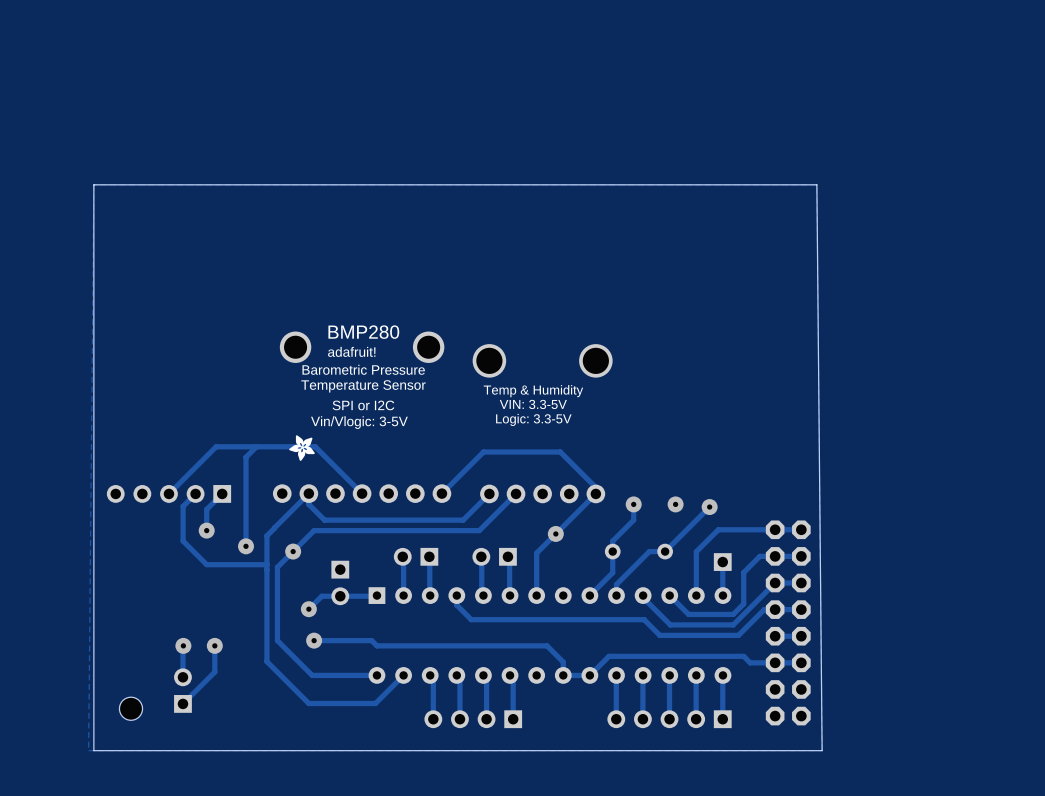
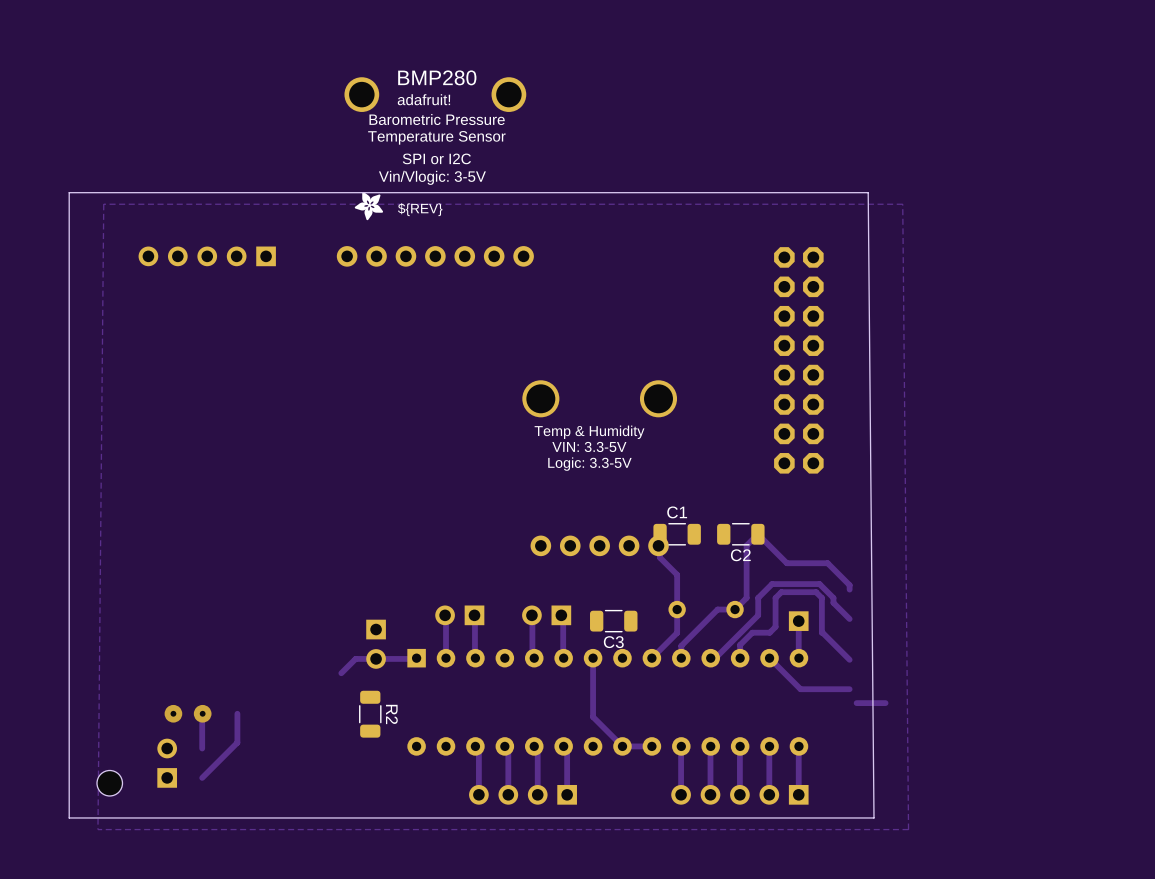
part: none -> (435, 171)
board edge: (816, 184) (822, 750) (93, 750) (93, 184) (816, 184) -> (868, 192) (874, 817) (69, 817) (69, 192) (868, 192)
part: none -> (207, 256)
part: none -> (798, 360)
part: (362, 417) -> none
track: (256, 446) (245, 457) (245, 546) -> none
C1: none -> (677, 534)
C2: none -> (740, 534)
part: (168, 493) -> none
track: (195, 493) (183, 506) (183, 541) (206, 564) (266, 564) -> none
track: (222, 493) (206, 509) (206, 530) -> none
track: (362, 493) (315, 446) (216, 446) (168, 493) (168, 500) -> none
track: (441, 493) (483, 452) (560, 452) (595, 487) (595, 493) (536, 553) (536, 595) -> (622, 746) (593, 717) (593, 658)
track: (489, 493) (463, 520) (324, 520) (308, 504) (308, 493) (266, 535) (266, 661) (308, 703) (375, 703) (403, 675) -> none
track: (516, 493) (479, 530) (314, 530) (277, 567) (277, 640) (312, 675) (376, 675) -> none
track: (633, 504) (633, 520) (612, 541) -> (660, 534) (660, 557) (677, 574) (677, 597)
via: (633, 504) -> none
via: (675, 504) -> none
track: (709, 507) (675, 541) -> (849, 589) (849, 585) (827, 563) (786, 563) (757, 534) (746, 545) (746, 597)
via: (709, 507) -> none
track: (801, 529) (718, 529) (696, 551) (696, 595) -> (849, 689) (800, 689) (769, 658)
via: (206, 530) -> none
via: (555, 533) -> none
via: (245, 546) -> none
via: (293, 551) -> none
track: (801, 556) (759, 556) (743, 572) (743, 603) (733, 614) (688, 614) (669, 595) -> (849, 659) (821, 632) (821, 597) (816, 592) (781, 592) (775, 597) (775, 626) (769, 632) (752, 632) (740, 644) (740, 658)
track: none -> (849, 619) (833, 602) (833, 597) (819, 584) (772, 584) (758, 597) (758, 615) (715, 658)
C3: none -> (613, 621)
track: (801, 583) (775, 583) (733, 624) (670, 624) (643, 595) -> none
track: (456, 595) (456, 605) (471, 619) (644, 619) (659, 635) (738, 635) (764, 609) (801, 609) -> none
via: (308, 609) -> none
part: (788, 622) -> none
track: (314, 640) (371, 640) (376, 645) (547, 645) (563, 662) (563, 675) -> none
via: (314, 640) -> none
via position: (214, 645) -> (173, 713)
R2: none -> (370, 714)
track: (801, 662) (750, 662) (743, 656) (608, 656) (589, 675) -> none
part position: (182, 690) -> (167, 763)
part position: (131, 708) -> (109, 783)

